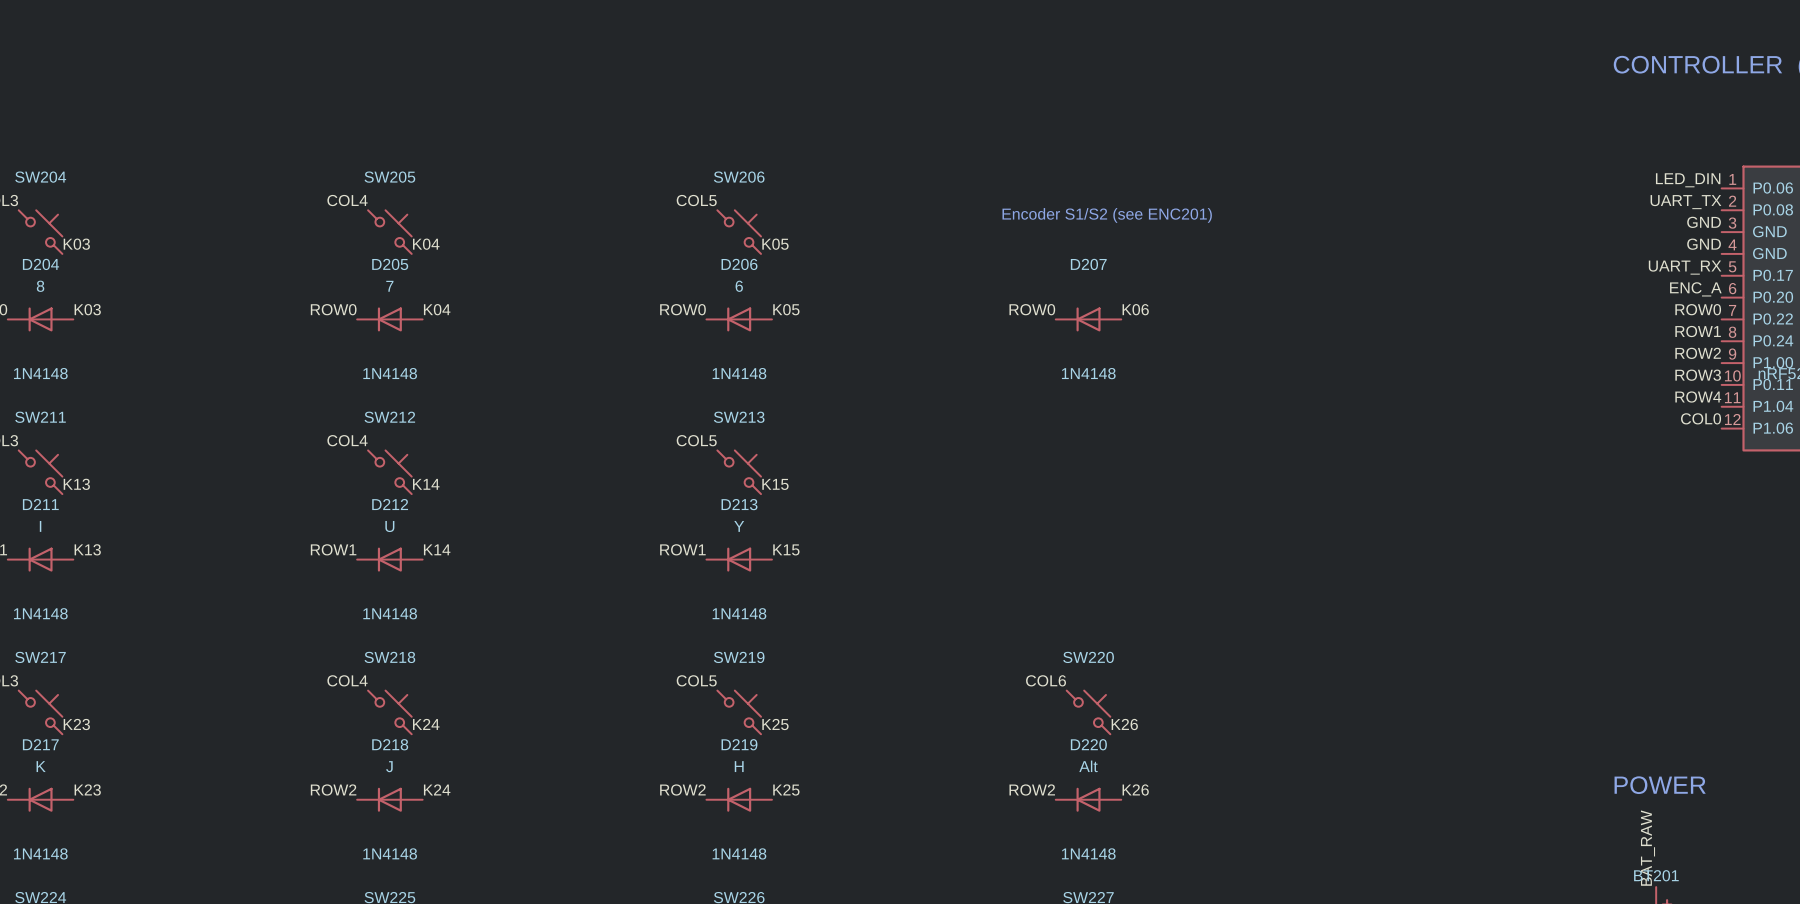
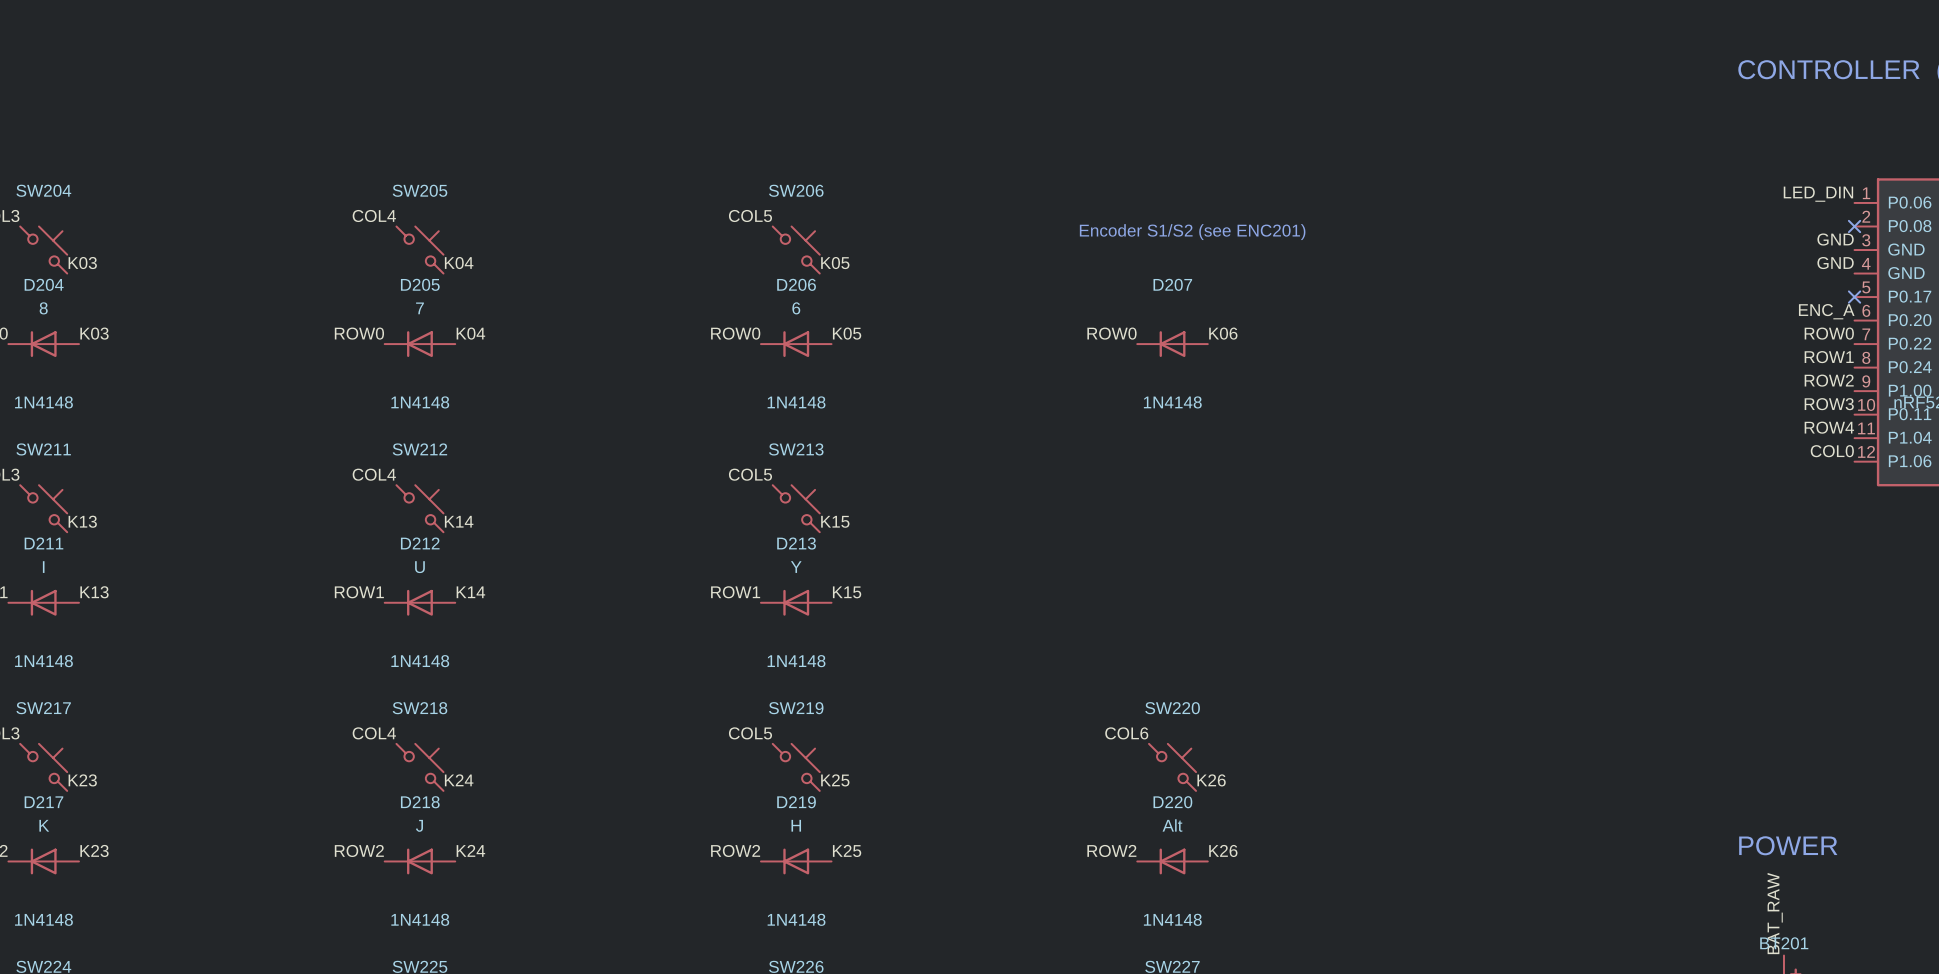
label: UART_TX (1685, 202) -> none
no-connect mark: none -> (1854, 226)
label: UART_RX (1685, 267) -> none
no-connect mark: none -> (1854, 297)

